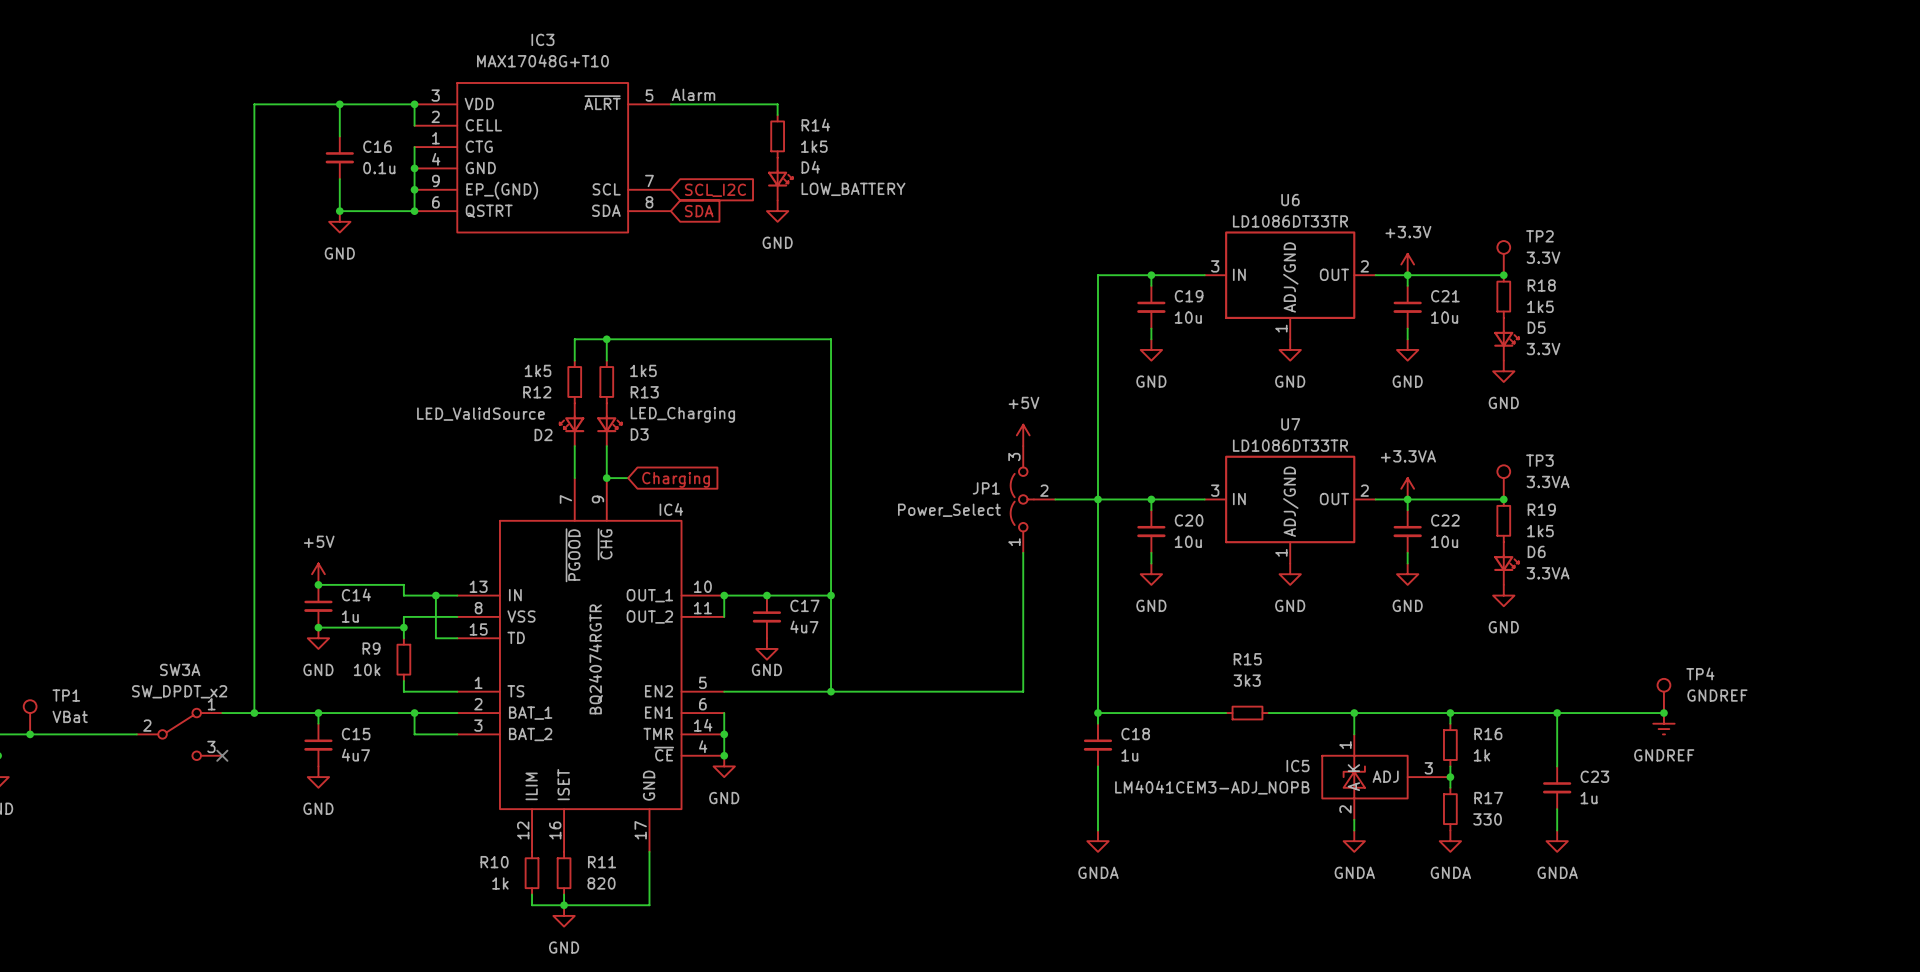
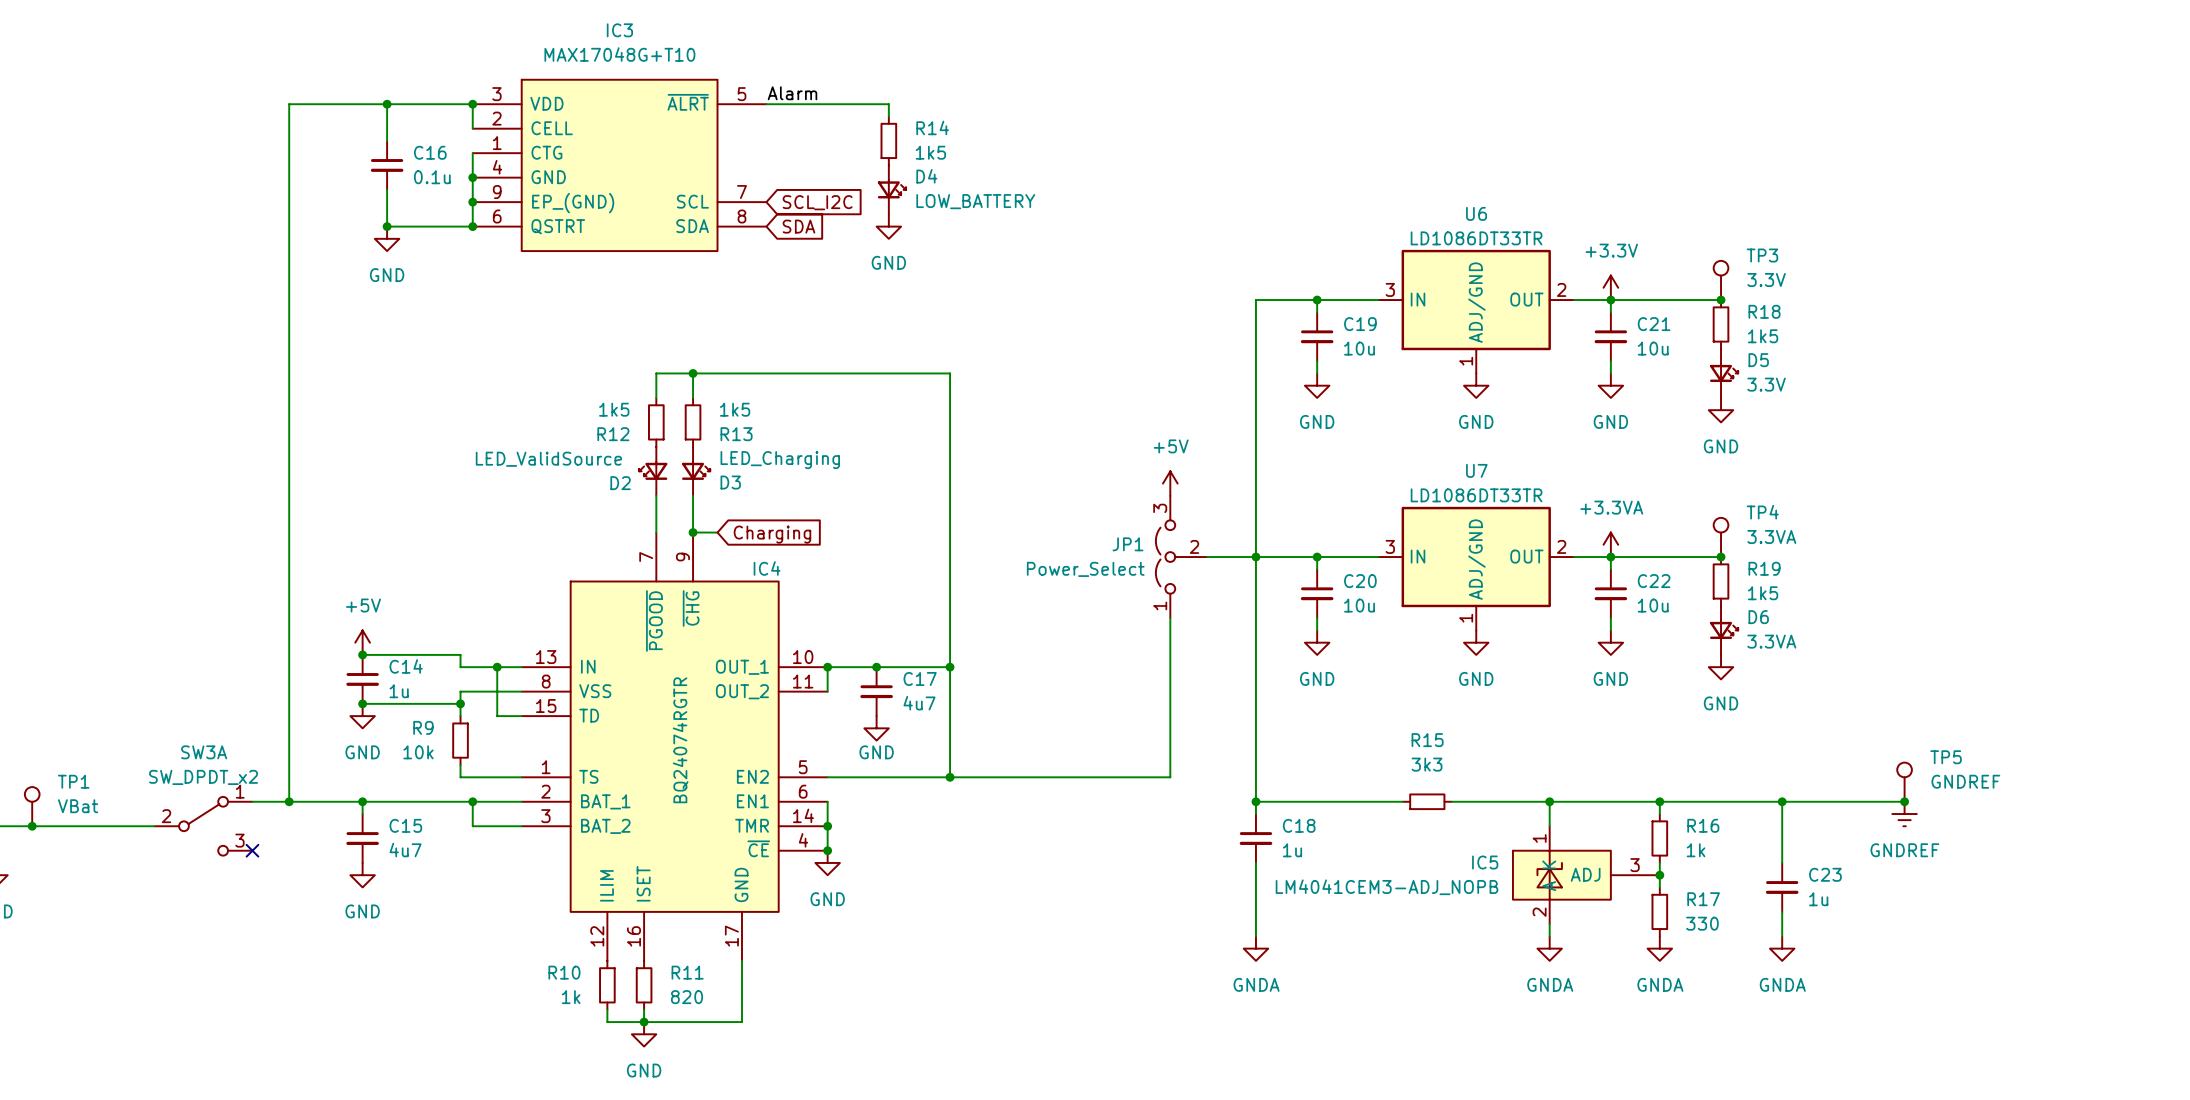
TP2 name: TP2 (1539, 236) -> TP3 (1762, 255)
TP3 name: TP3 (1539, 460) -> TP4 (1762, 512)
TP4 name: TP4 (1700, 673) -> TP5 (1946, 757)

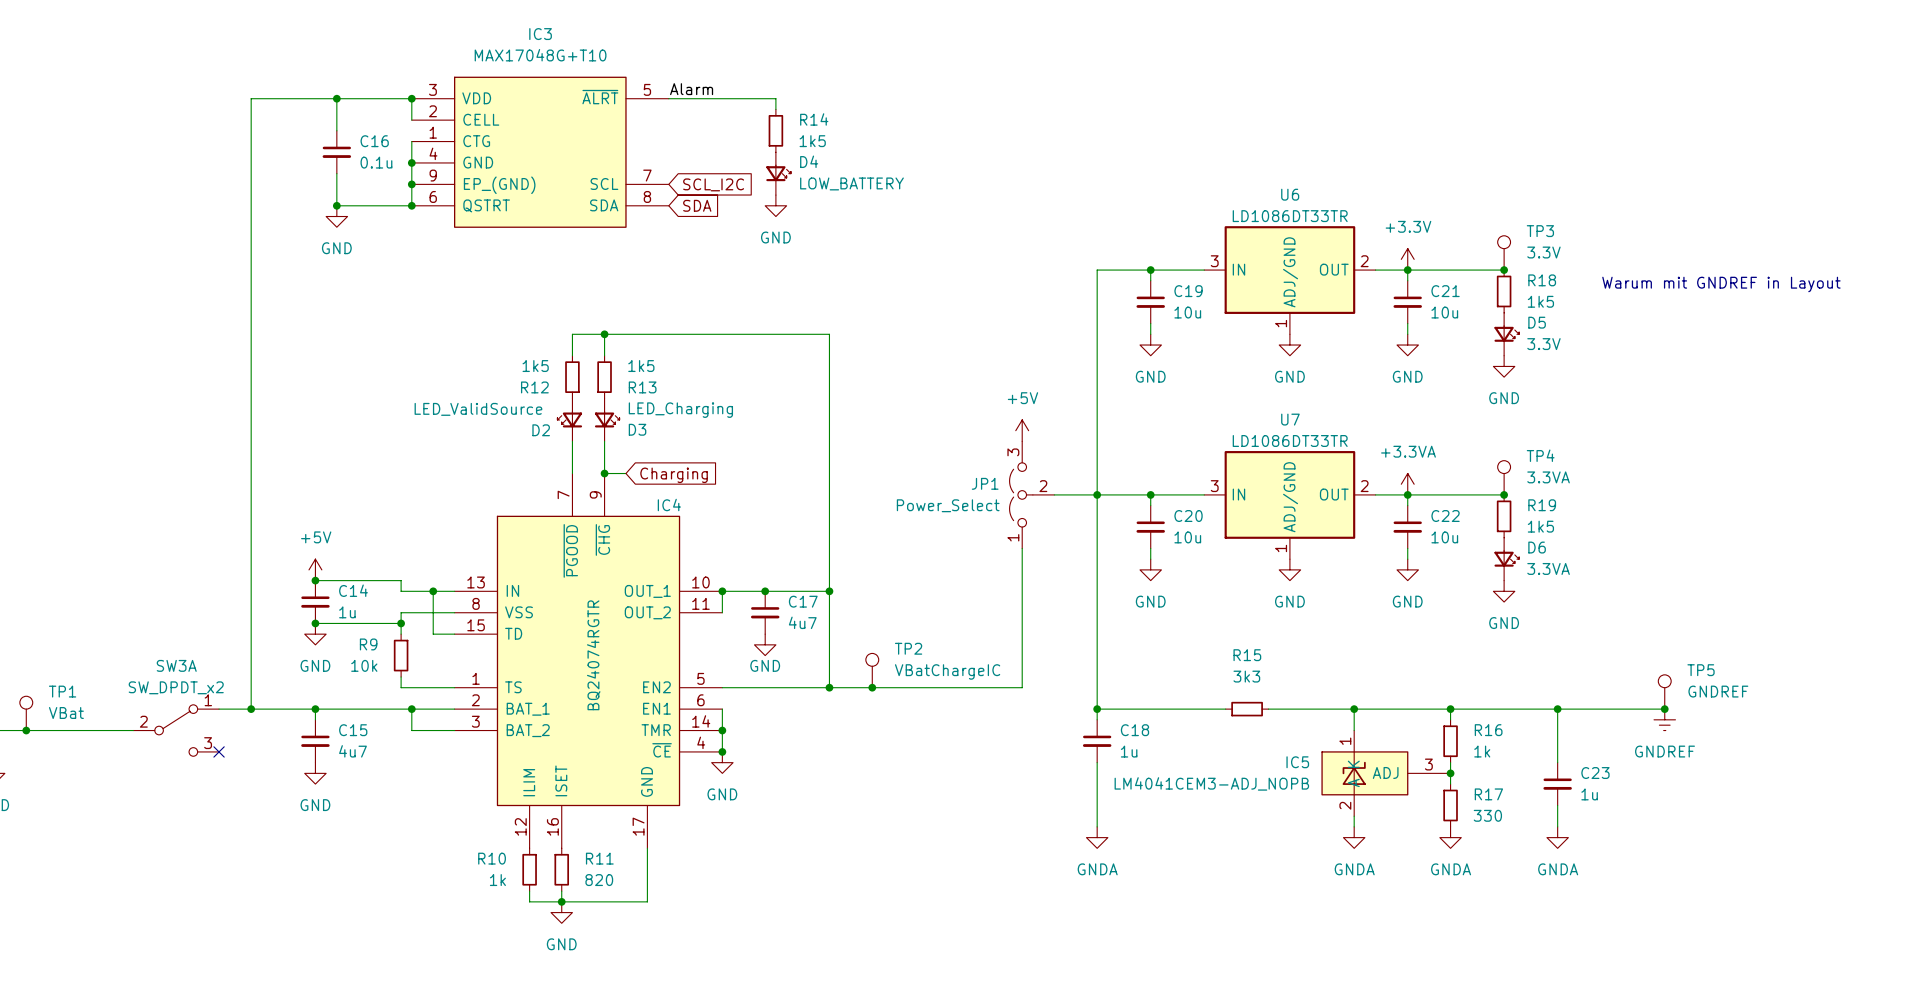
text: none -> Warum mit GNDREF in Layout (1721, 284)
TP2: none -> VBatChargeIC (872, 670)
junction: none -> (872, 687)

